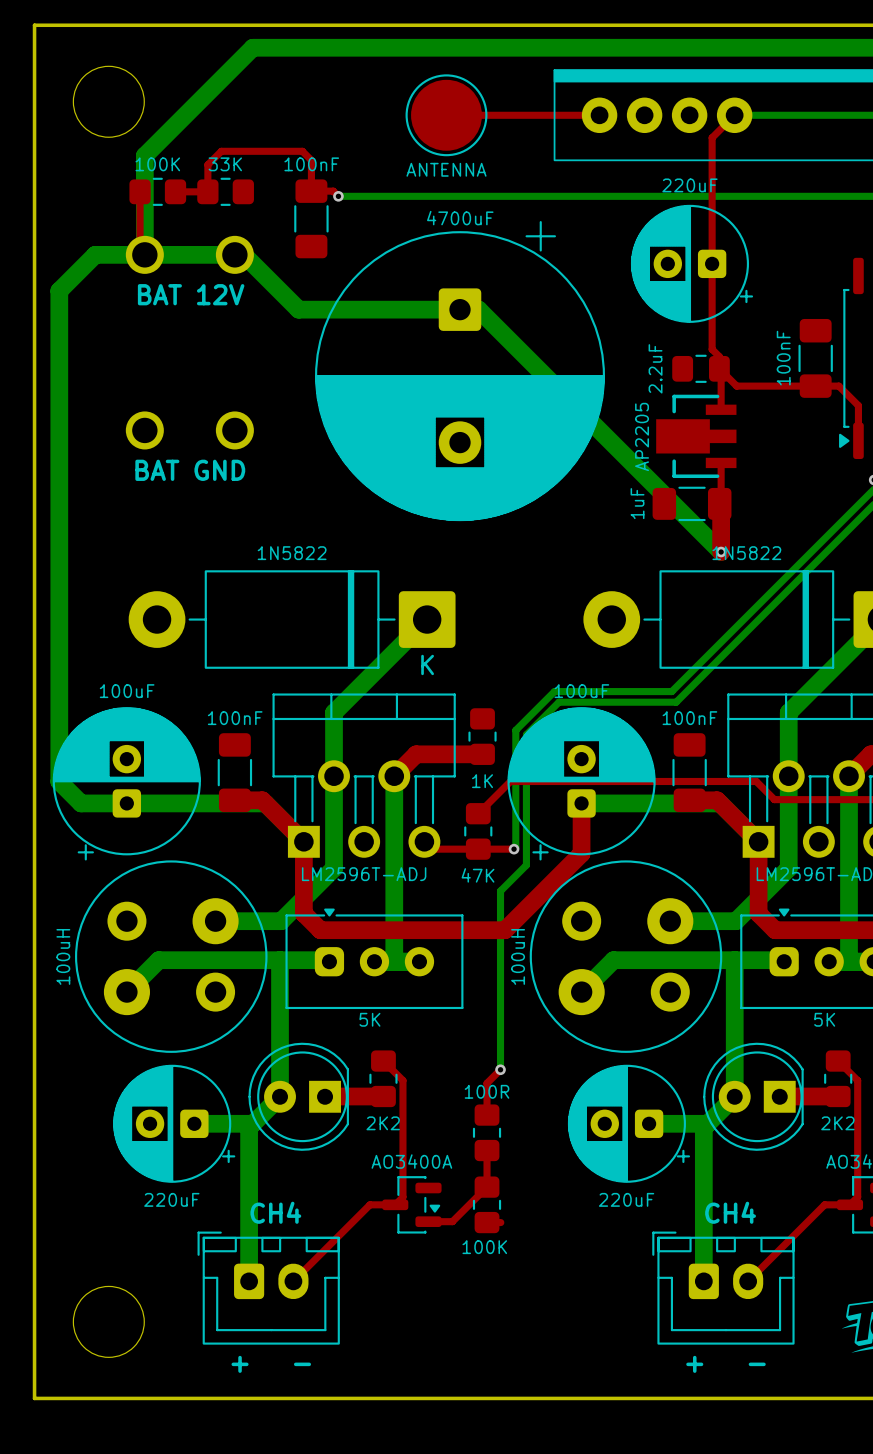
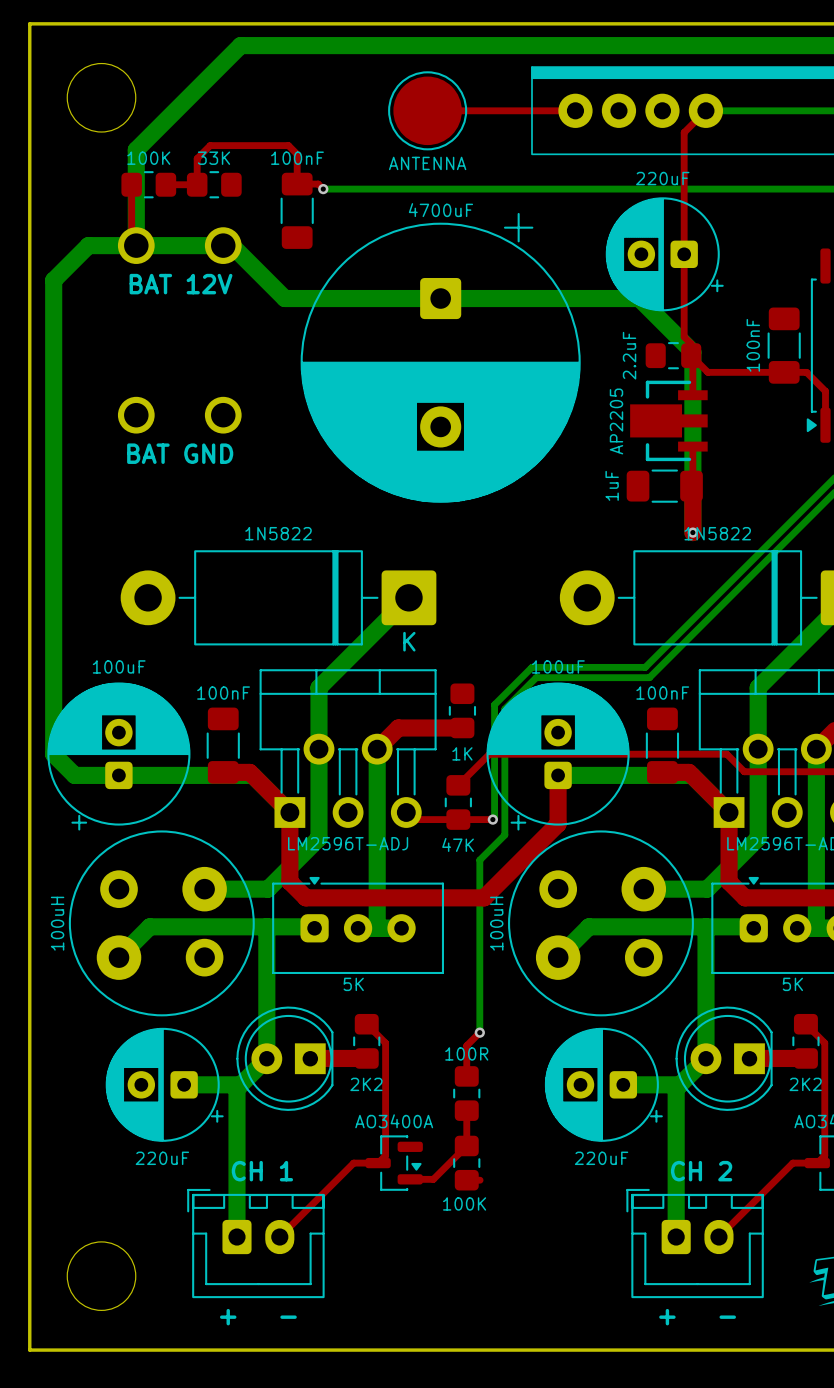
bottom track: (478, 309) (721, 552) -> (458, 298) (639, 298) (692, 352) (692, 532)
part value: CH4 (275, 1212) -> CH 1 (262, 1171)
part value: CH4 (730, 1212) -> CH 2 (701, 1171)

